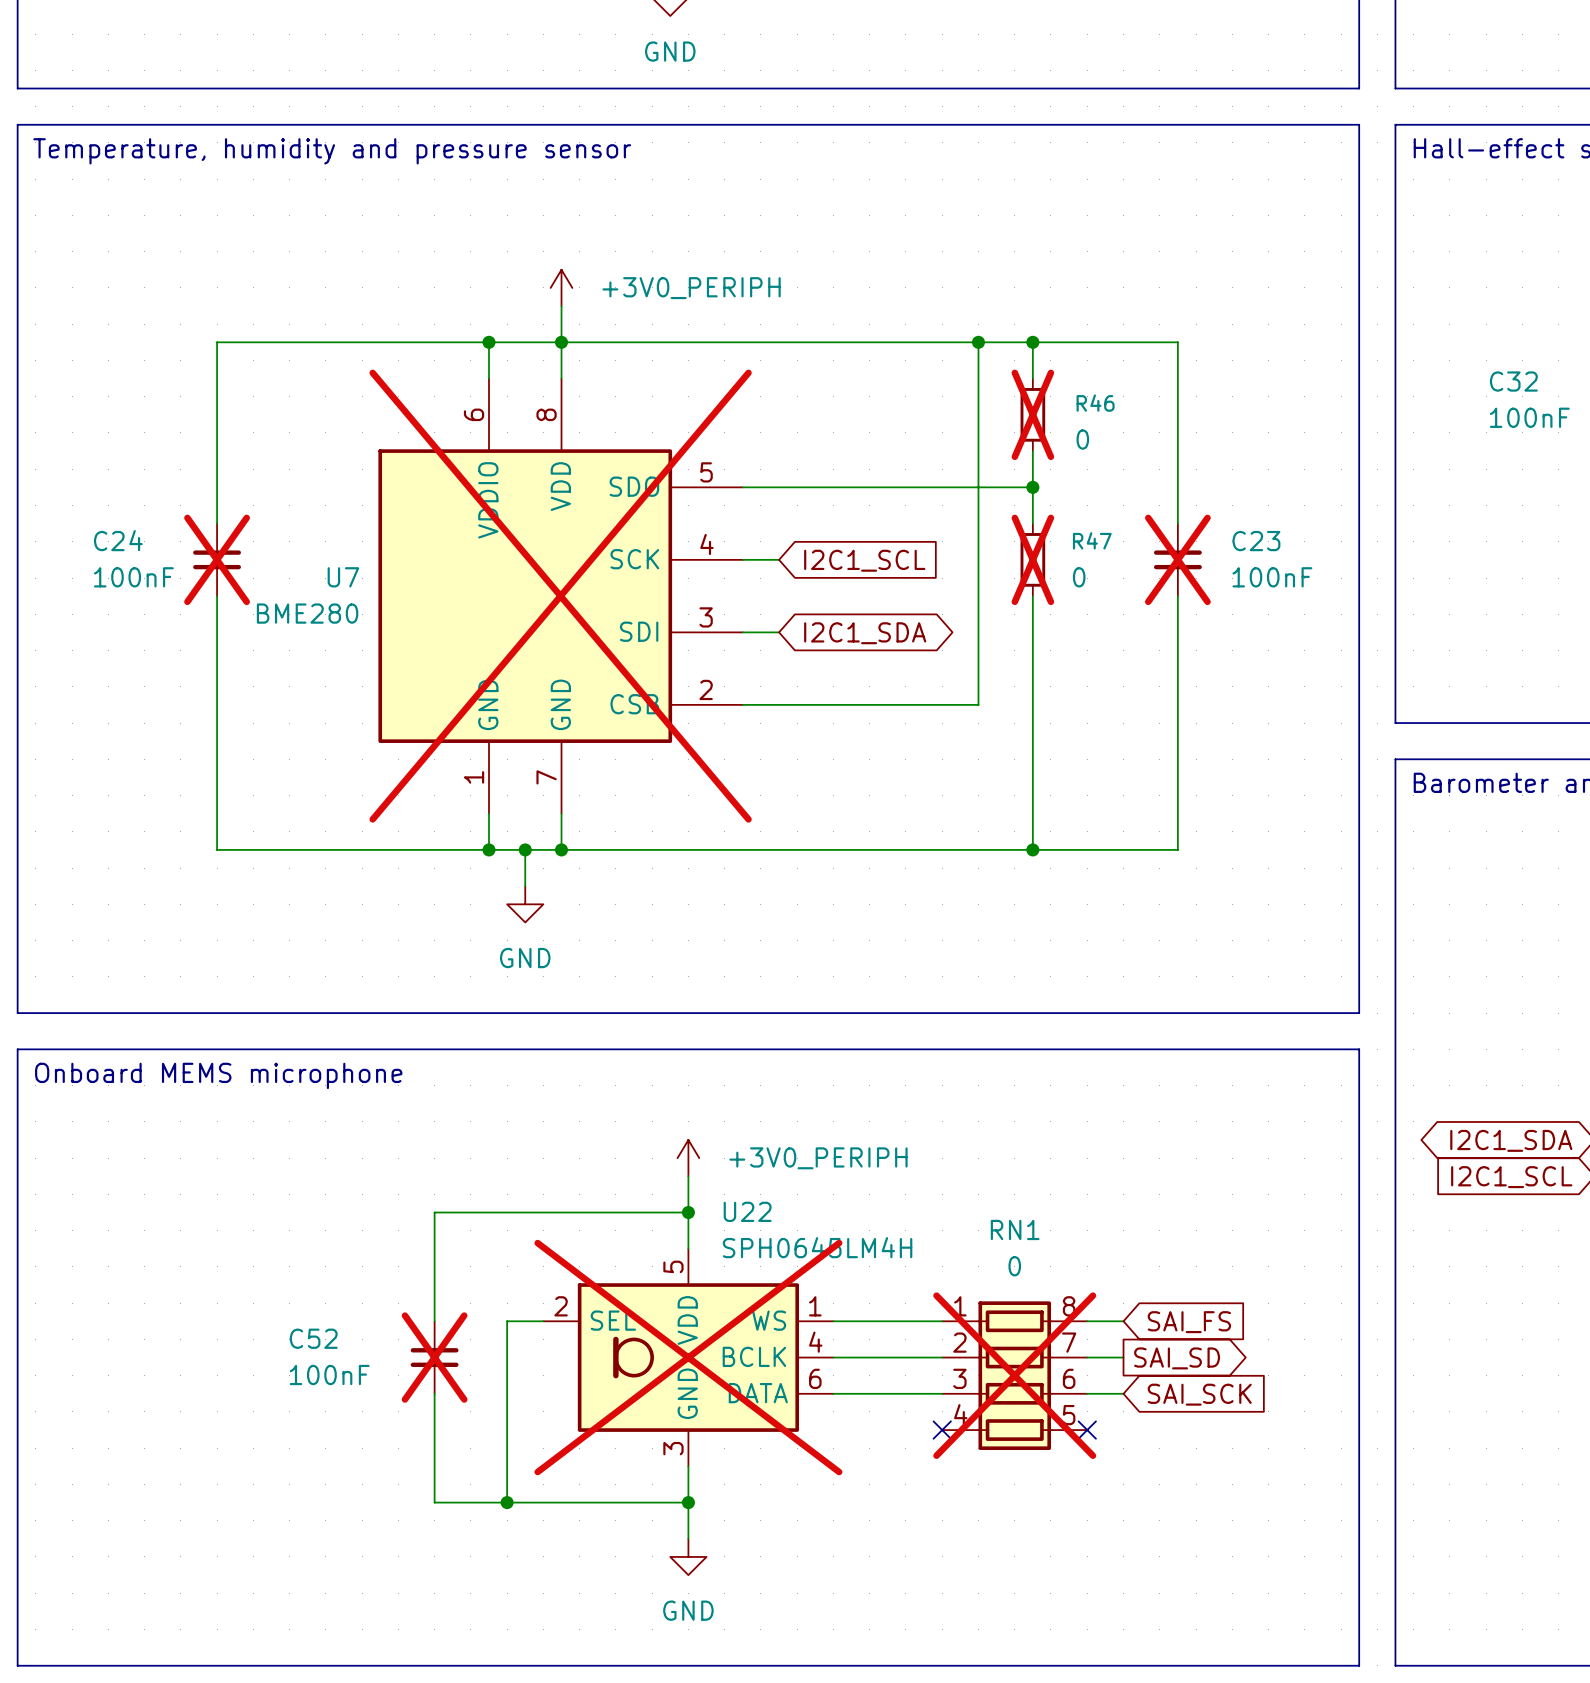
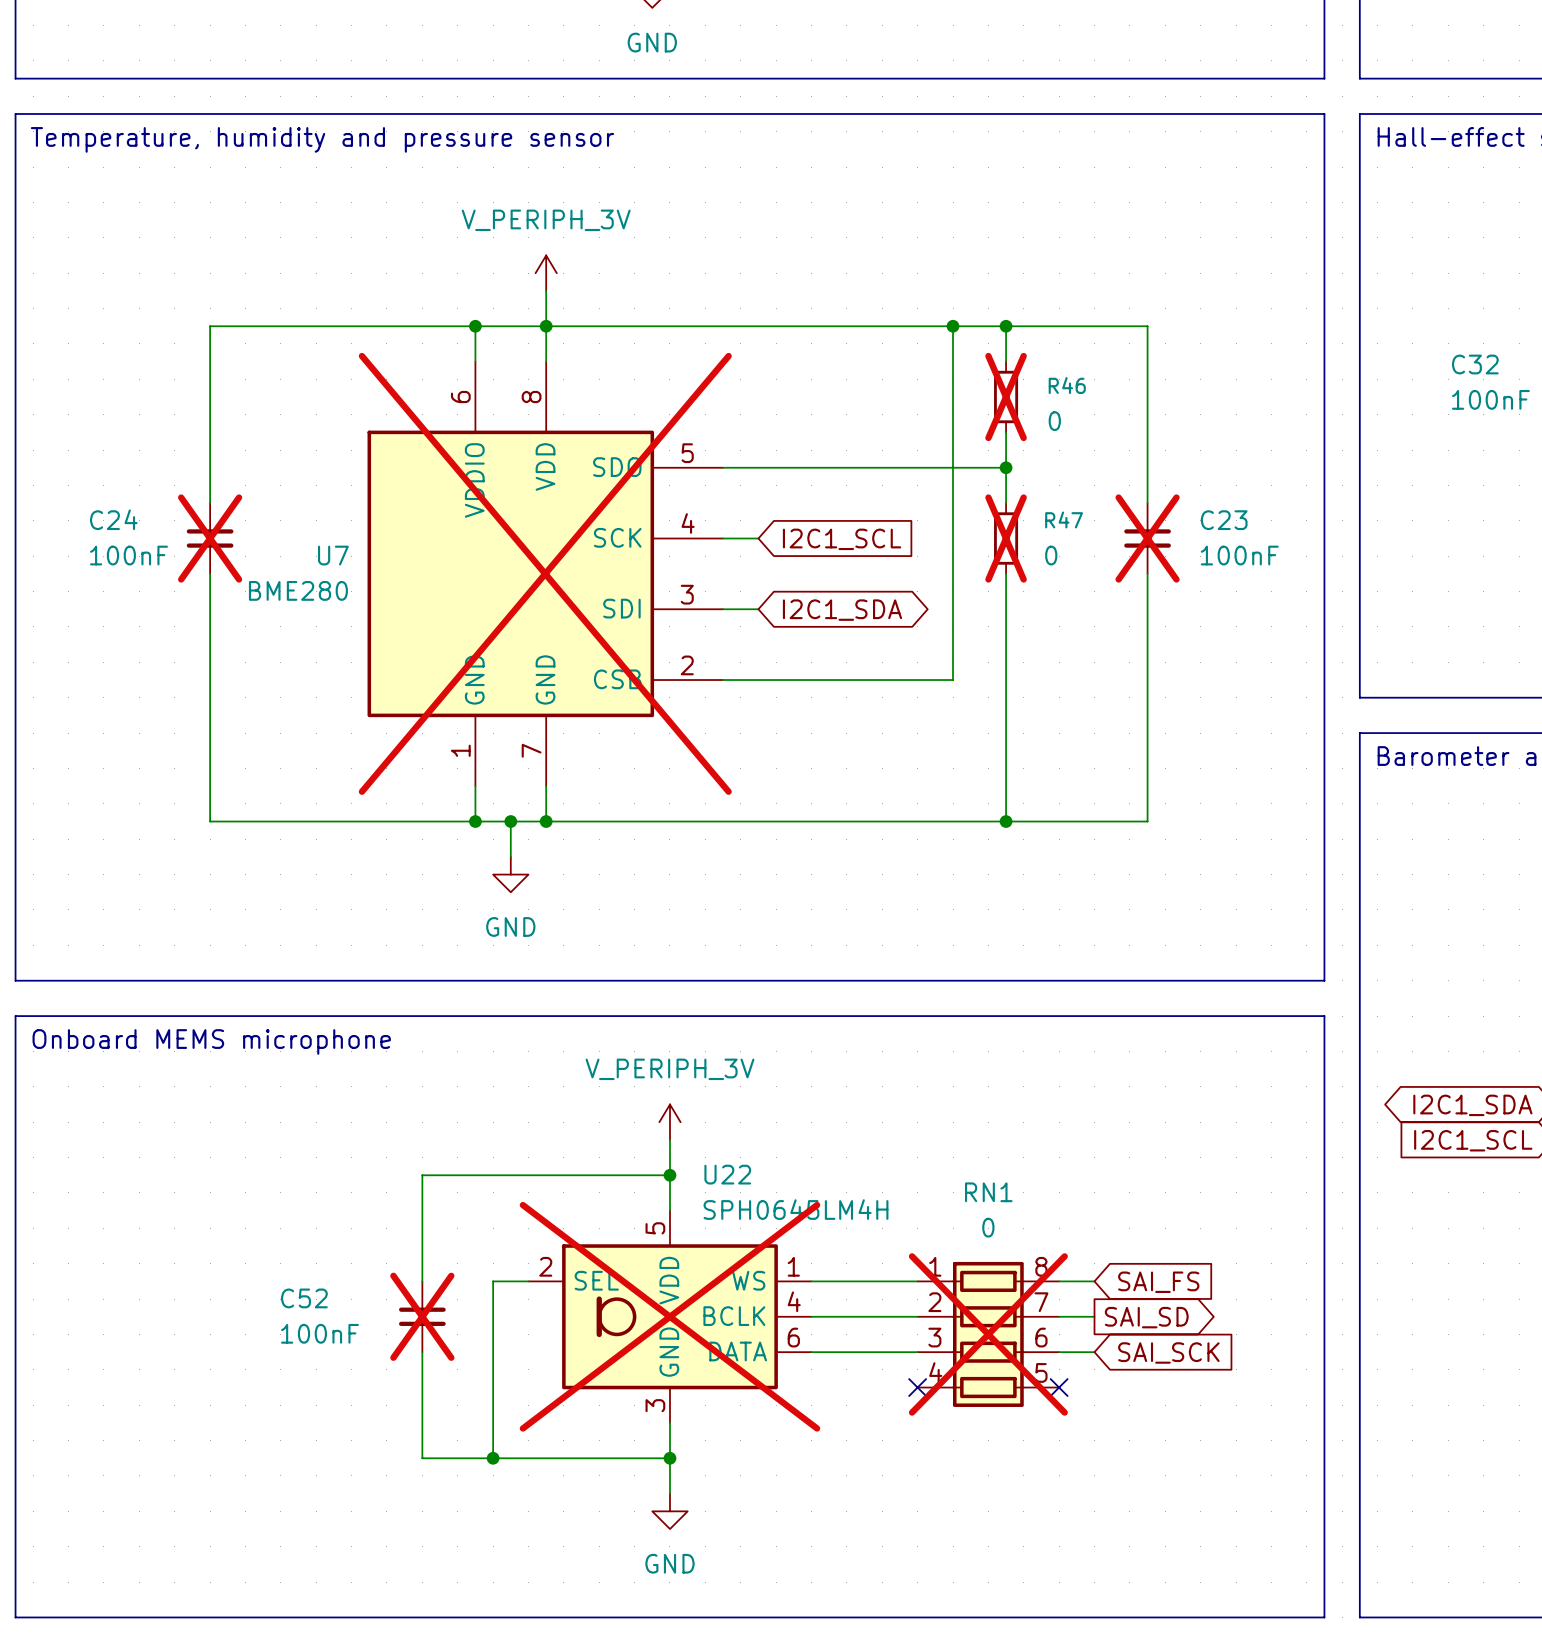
power symbol: +3V0_PERIPH (561, 287) -> V_PERIPH_3V (546, 273)
power symbol: +3V0_PERIPH (688, 1158) -> V_PERIPH_3V (669, 1122)

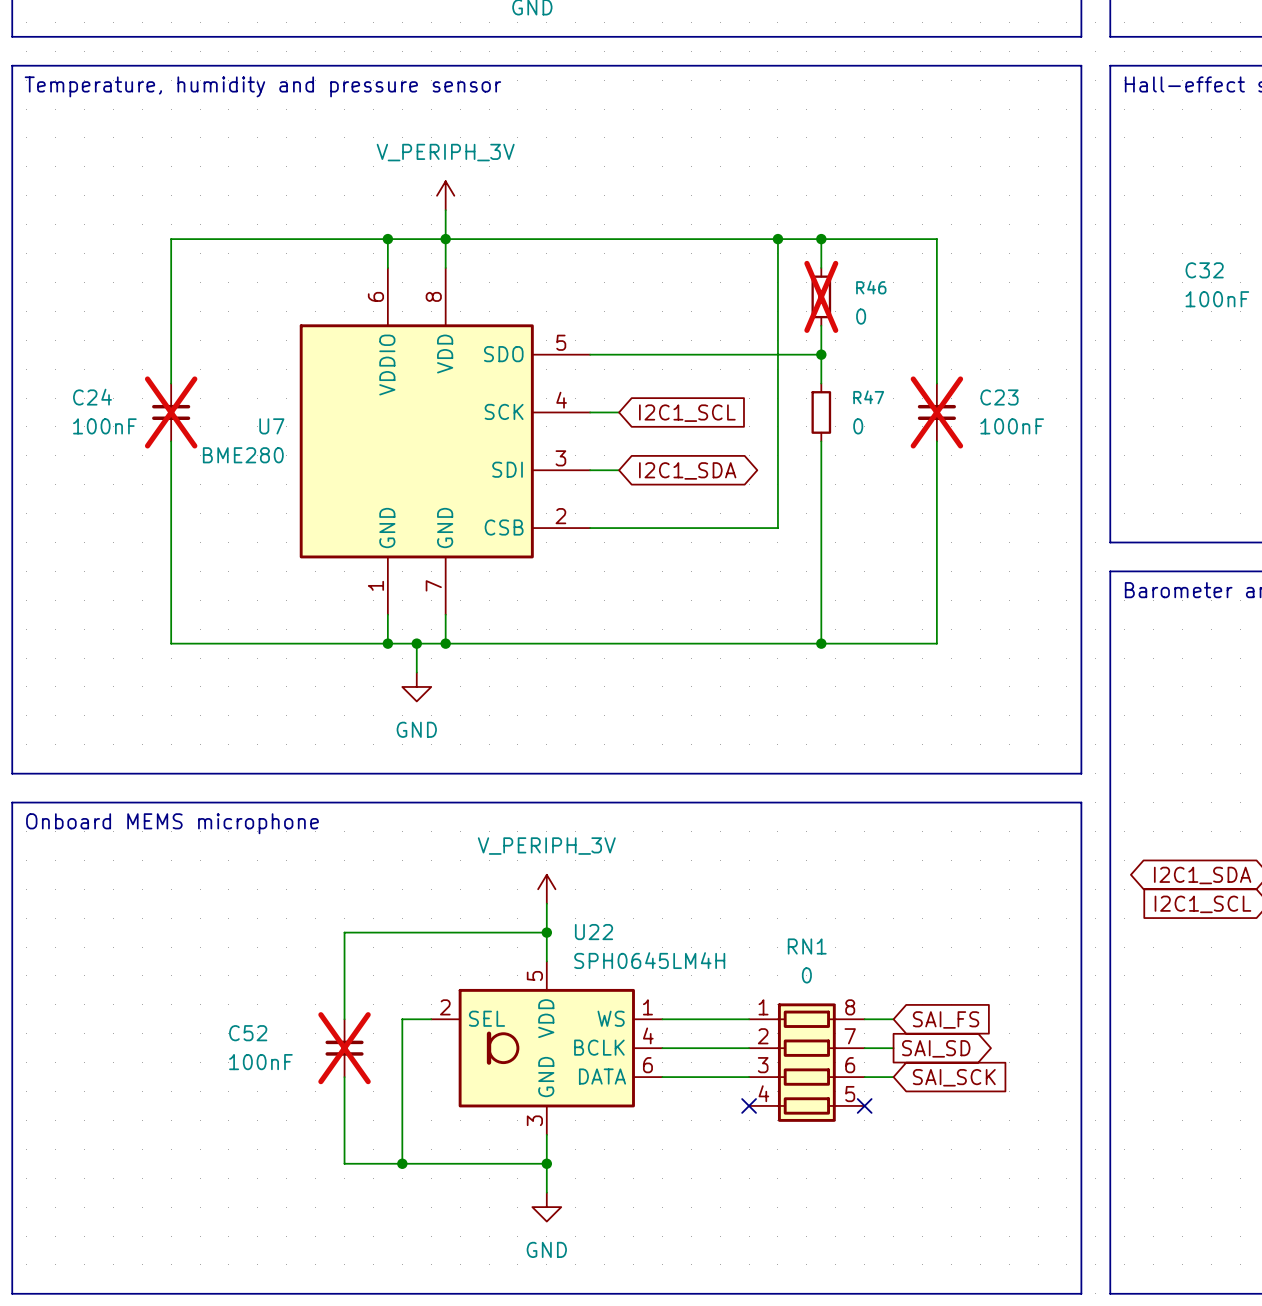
R47 do-not-place cross: (1006, 538) -> none
U7 do-not-place cross: (545, 573) -> none
U22 do-not-place cross: (669, 1316) -> none
RN1 do-not-place cross: (988, 1334) -> none

